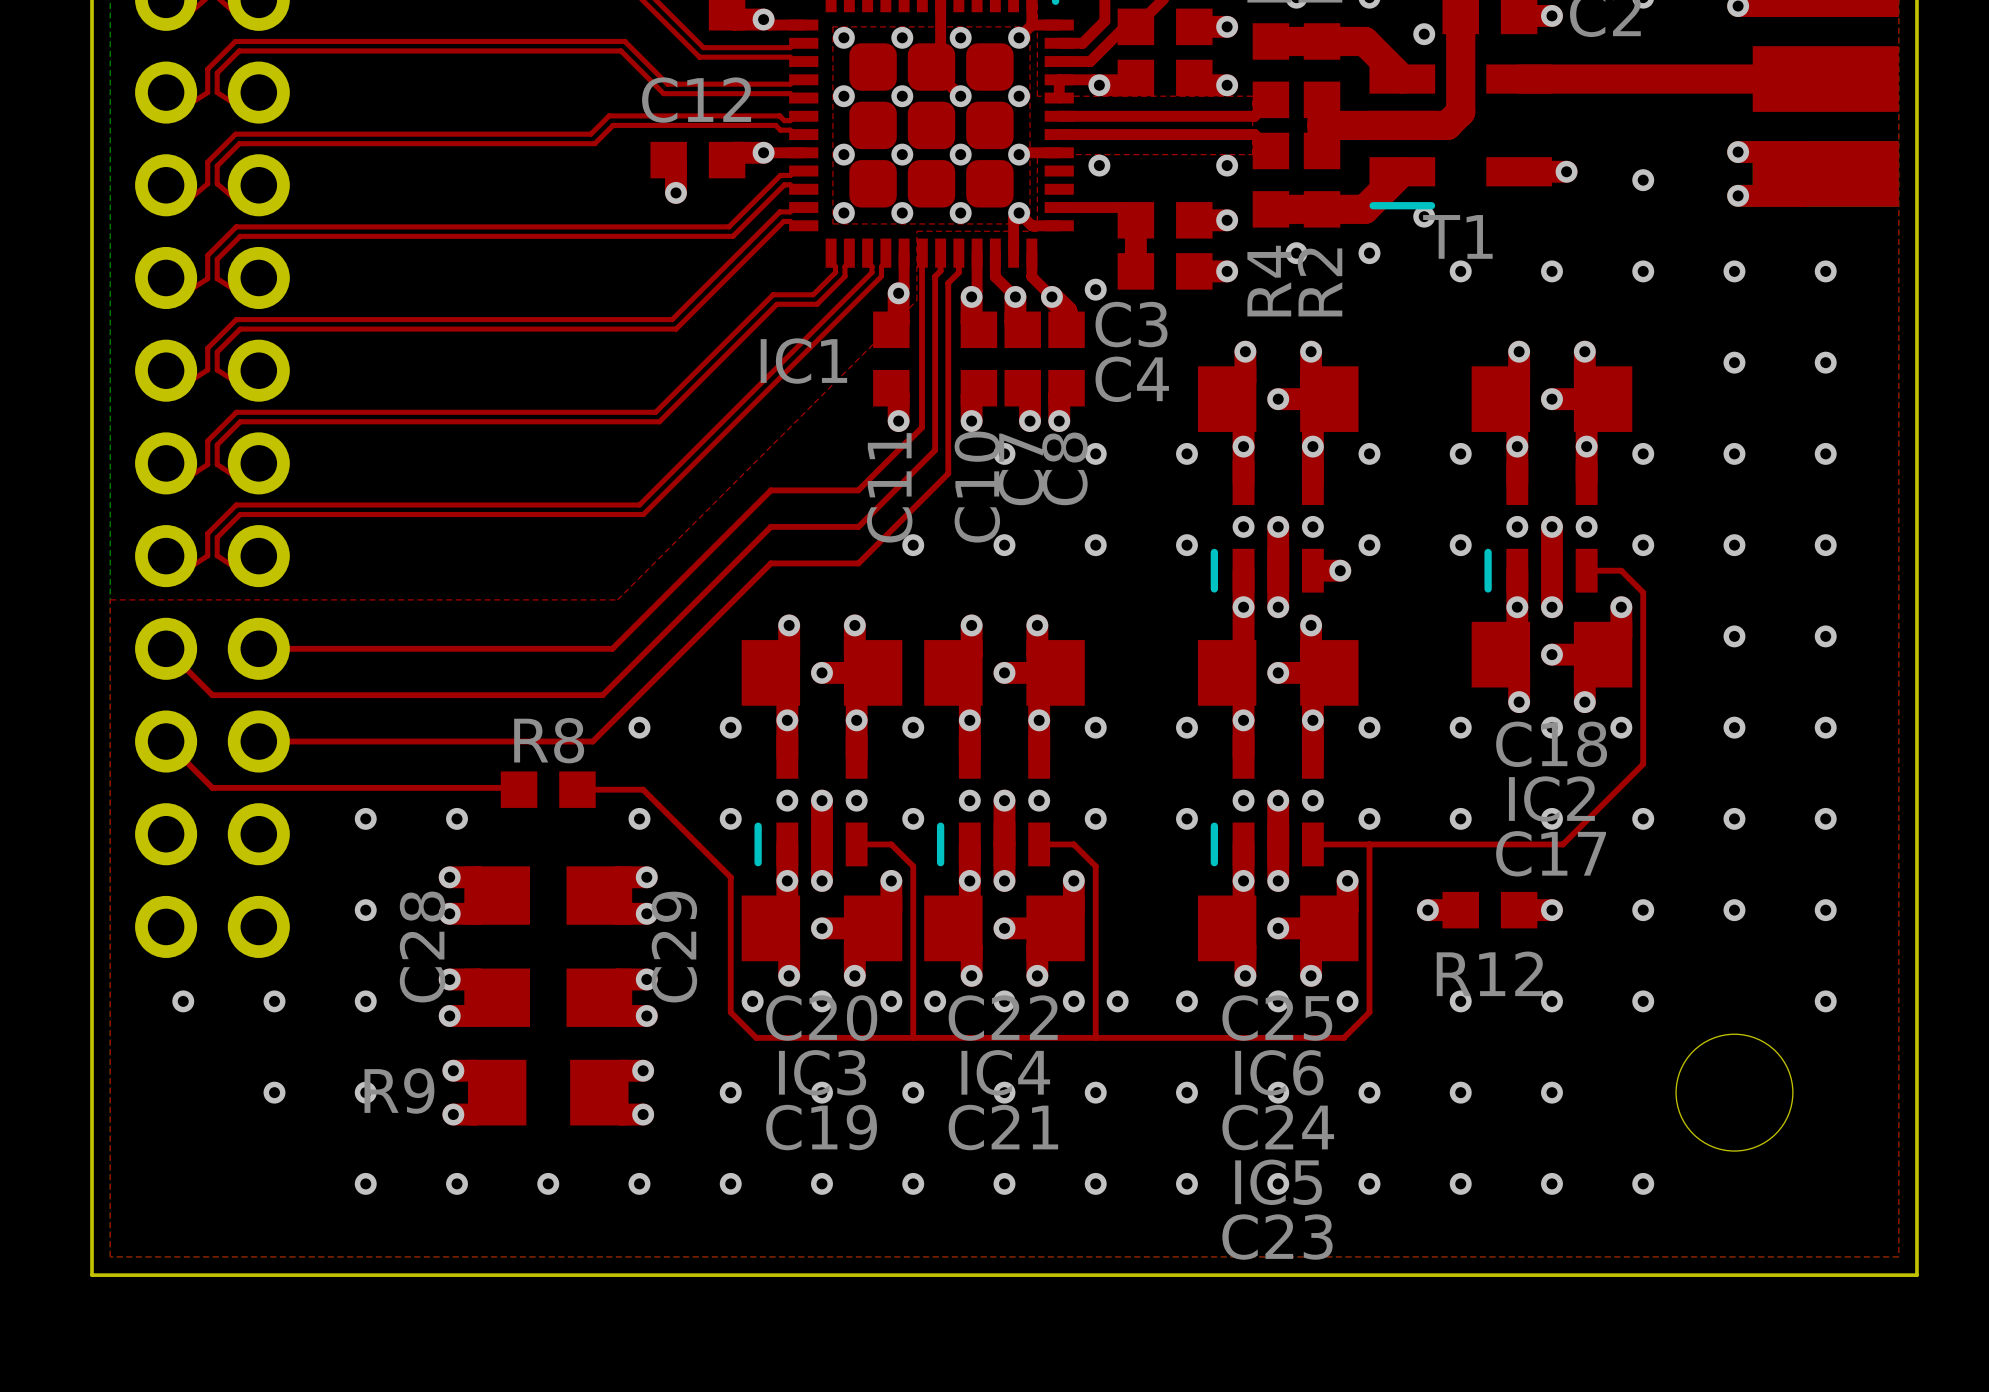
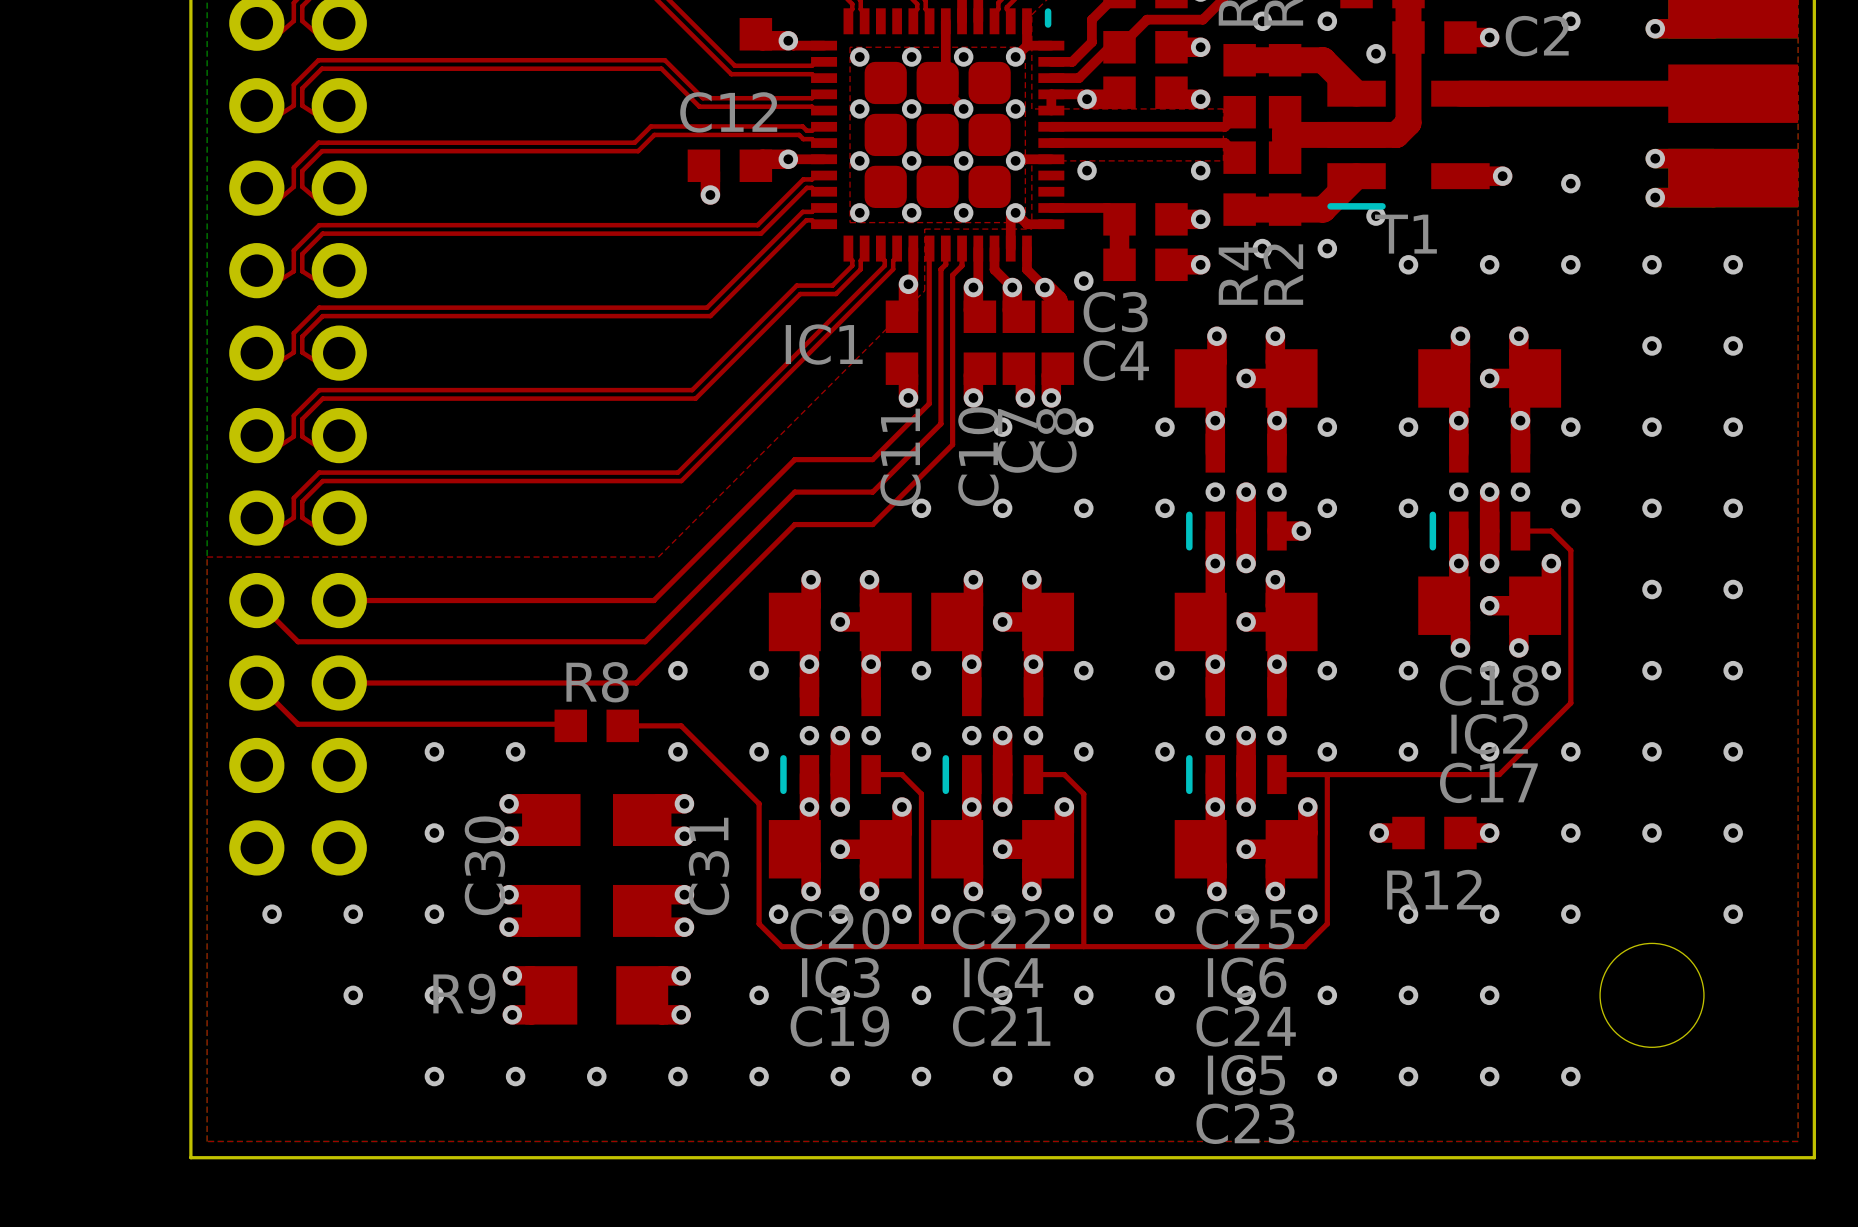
C28 name: C28 (422, 947) -> C30 (484, 865)
C29 name: C29 (674, 947) -> C31 (708, 866)

